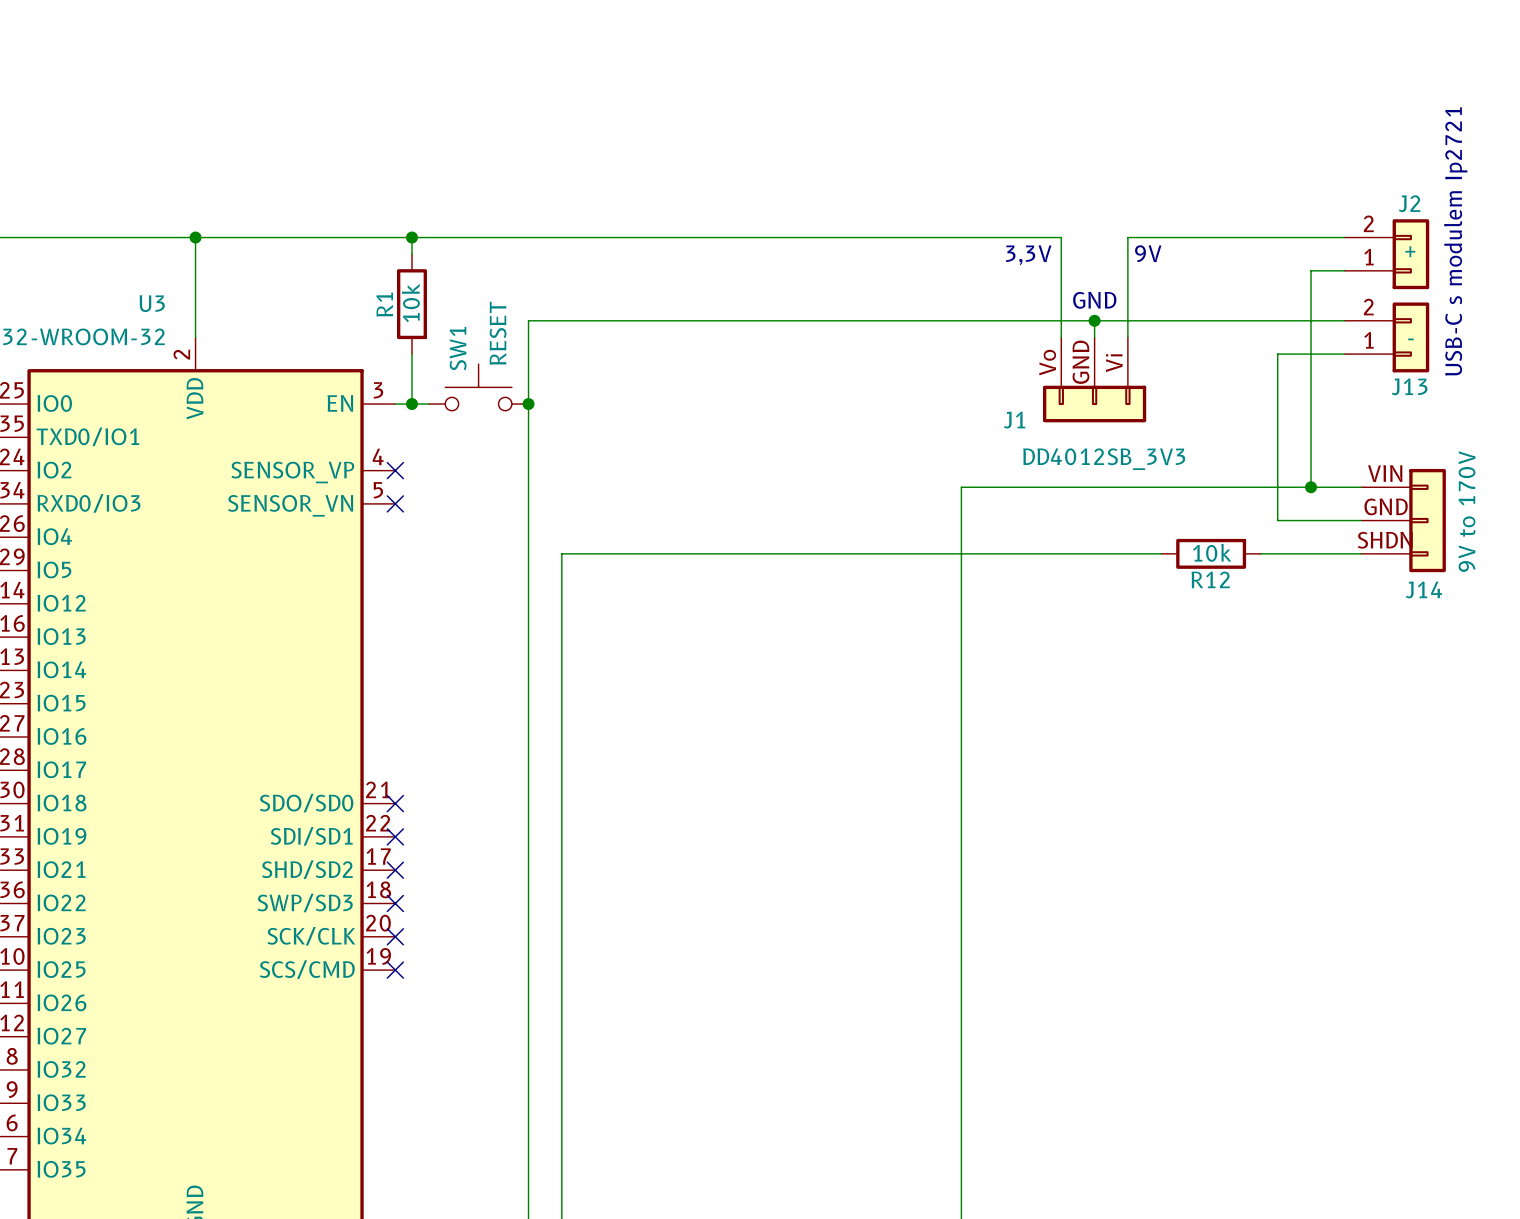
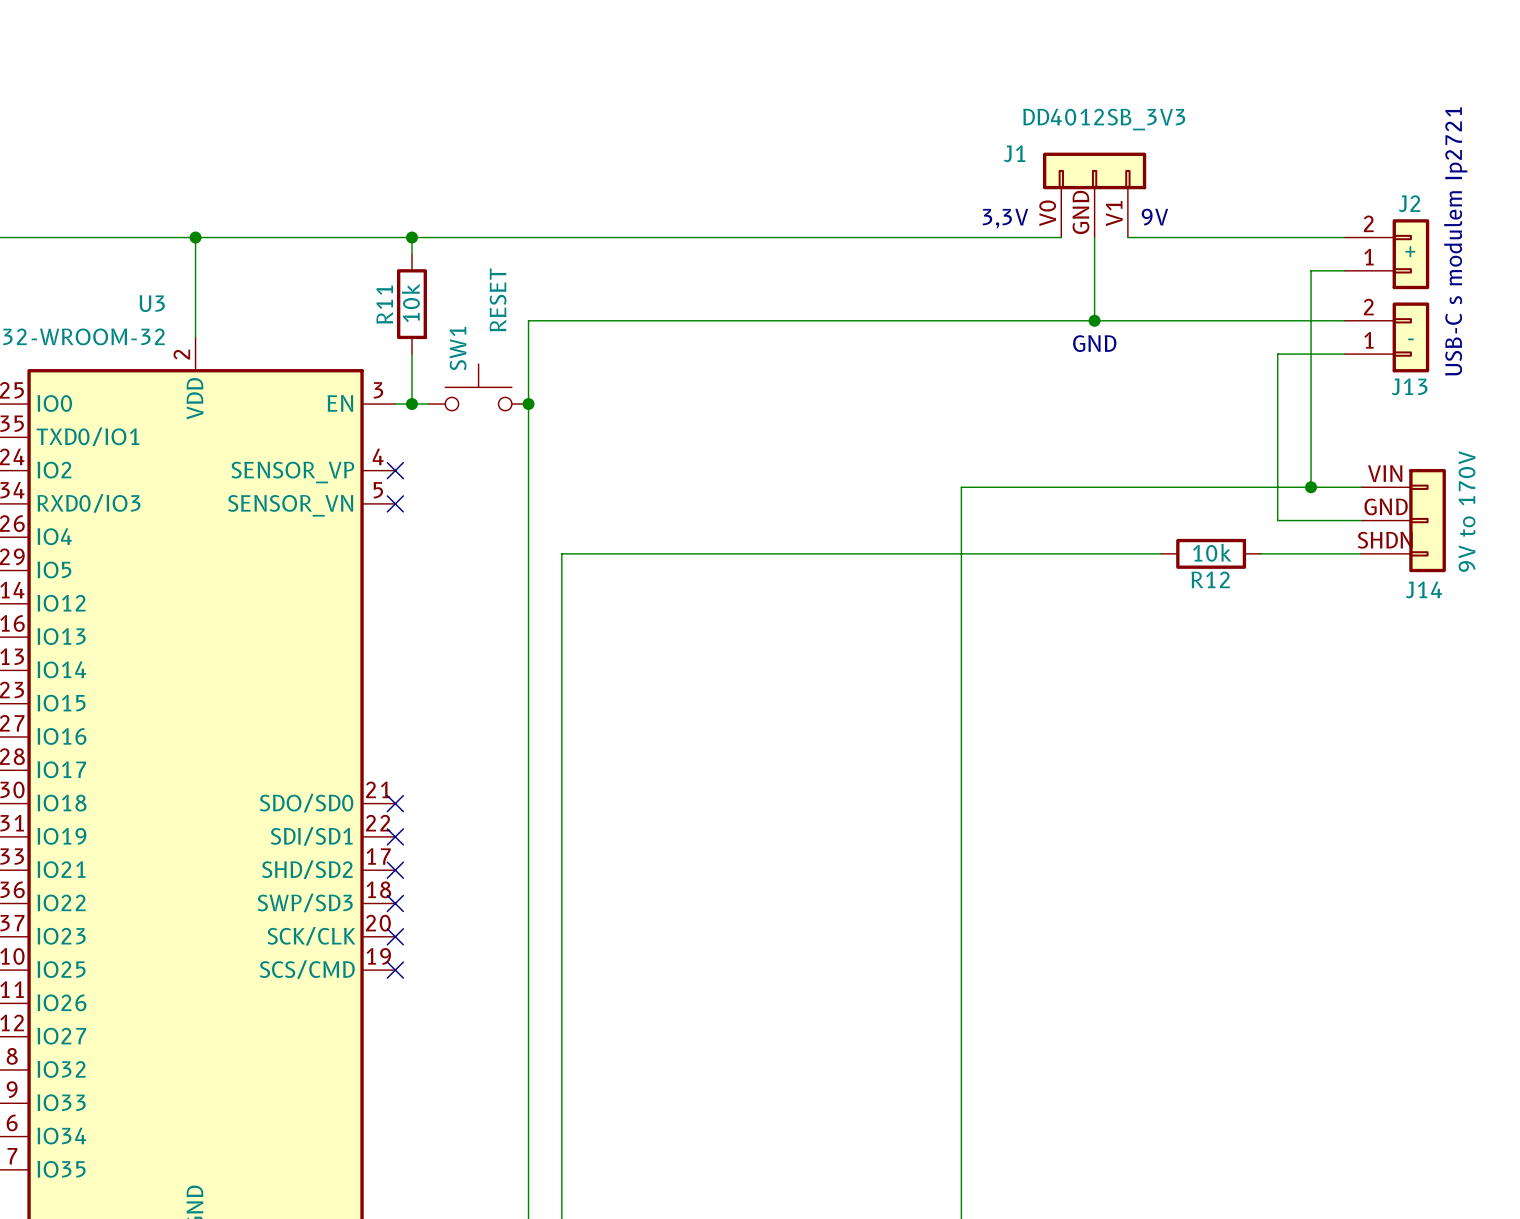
wire: (1061, 237) (1061, 337) -> none
wire: (1127, 237) (1127, 337) -> none
text position: 9V (1148, 253) -> 9V (1154, 217)
text position: 3,3V (1028, 255) -> 3,3V (1005, 218)
text position: GND (1094, 300) -> GND (1094, 343)
R1 name: R1 (384, 304) -> R11 (384, 304)
wire: (1094, 320) (1094, 337) -> (1094, 320) (1094, 237)
SW1 value position: RESET (498, 333) -> RESET (498, 299)
J1 symbol: [1042, 337, 1147, 423] -> [1042, 152, 1147, 238]
J1 name position: J1 (1014, 420) -> J1 (1014, 153)
J1 value position: DD4012SB_3V3 (1104, 459) -> DD4012SB_3V3 (1104, 119)

